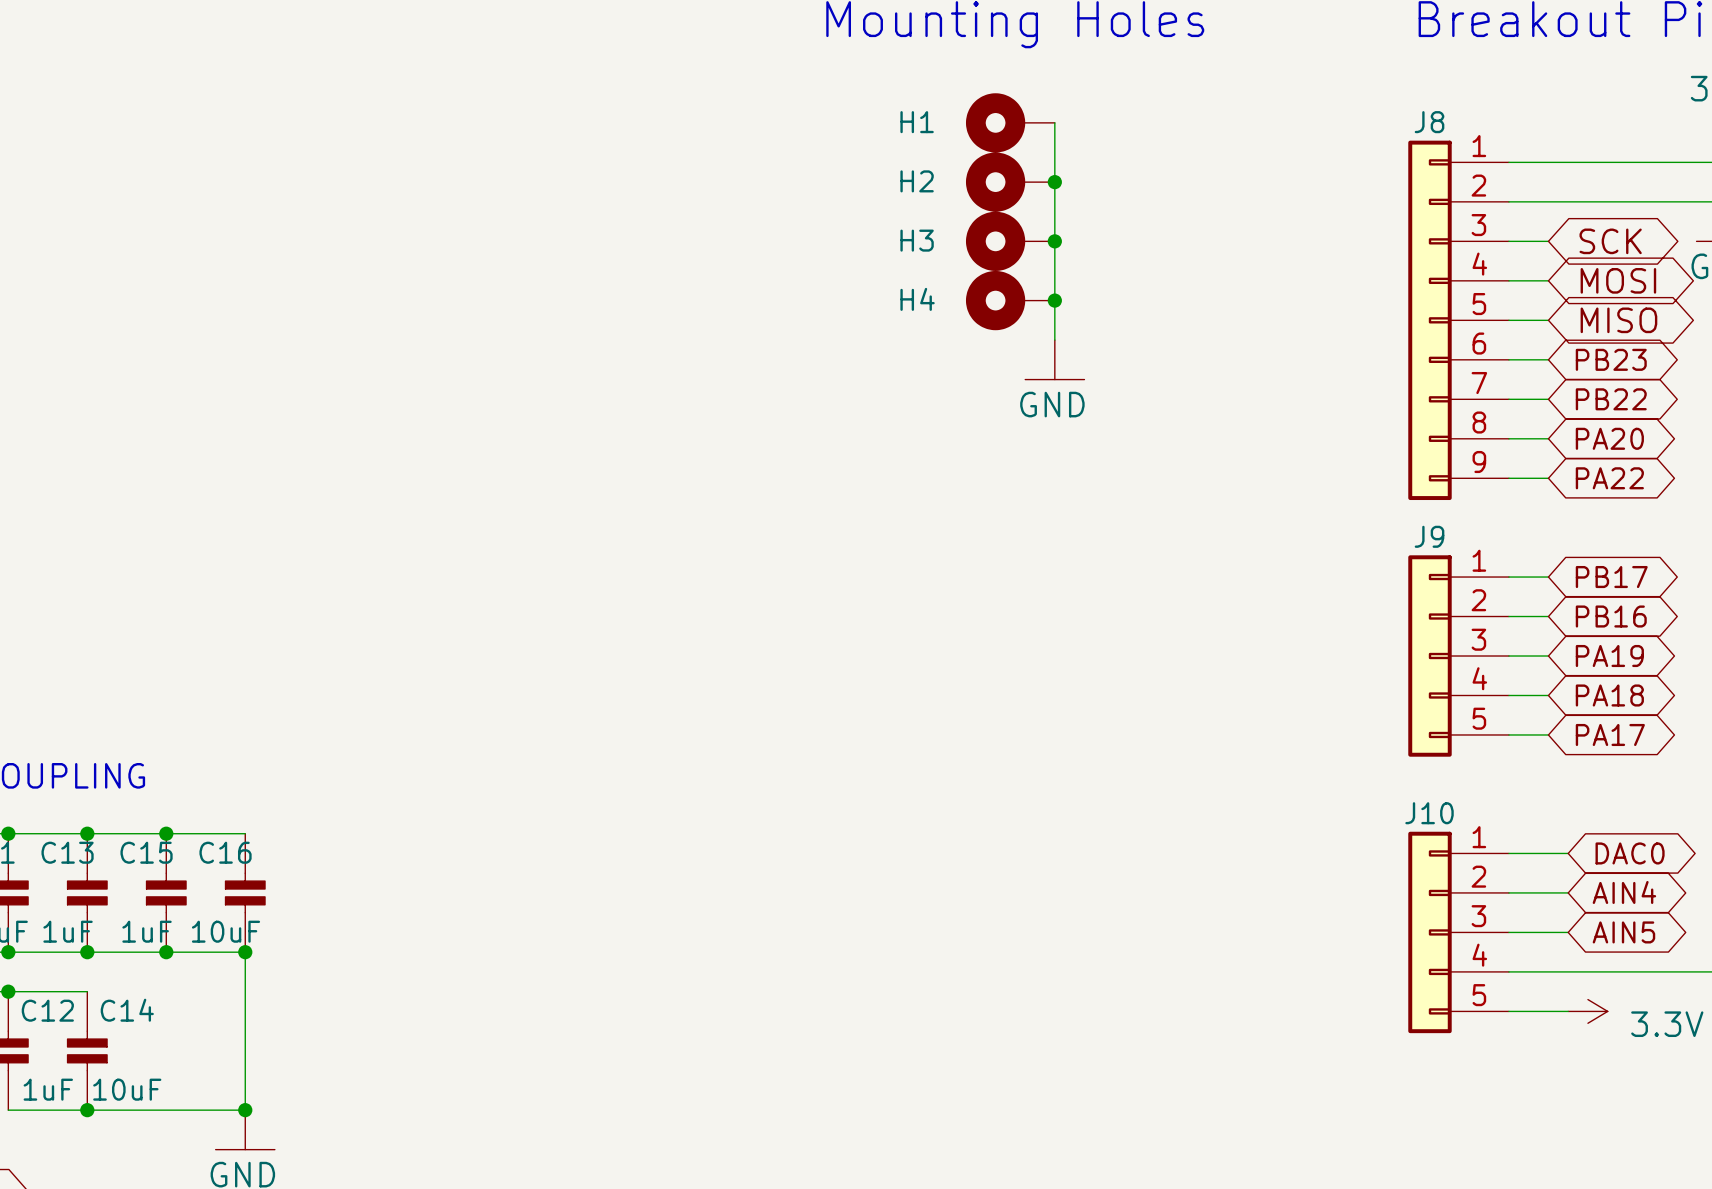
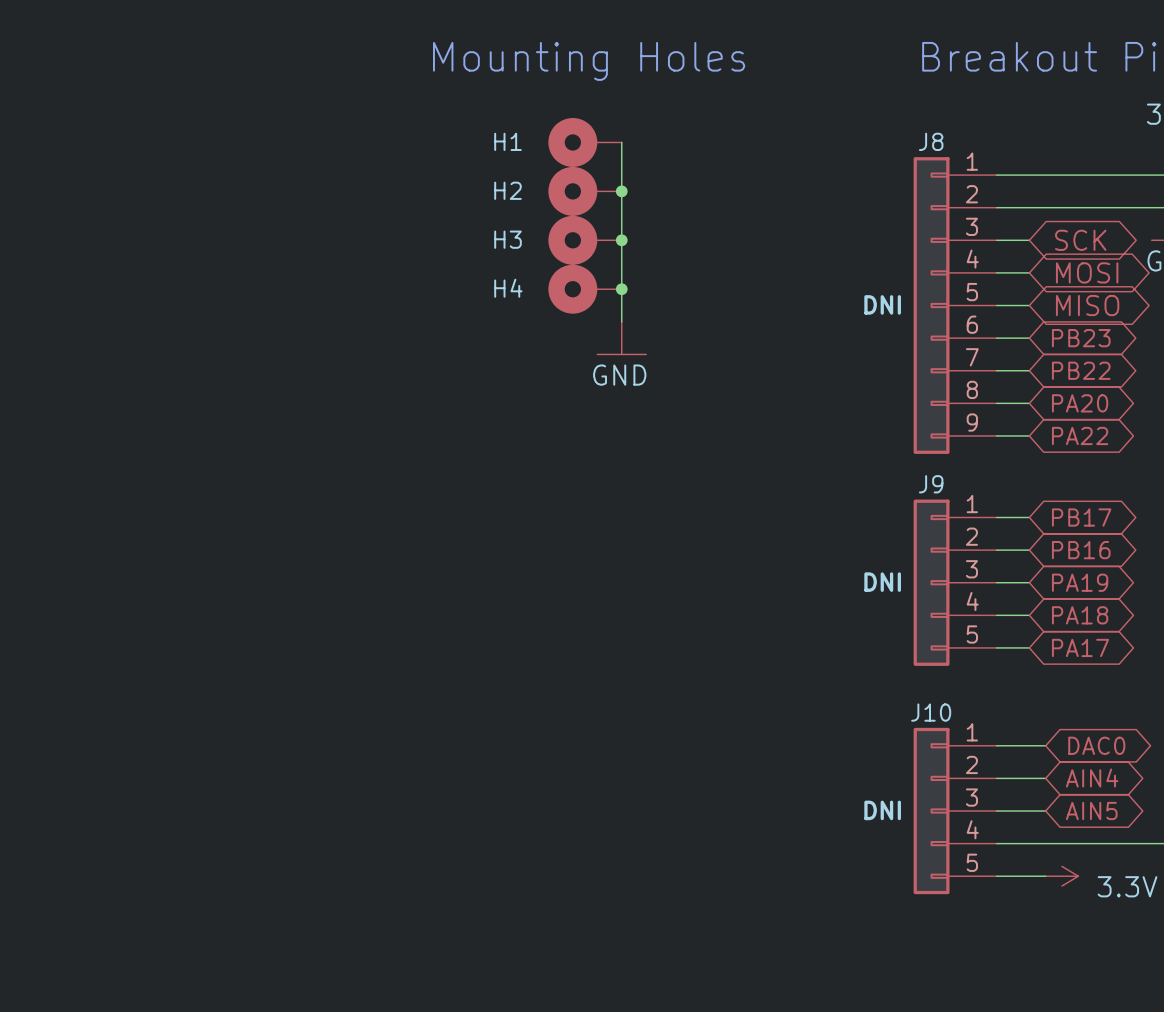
J8 text: none -> DNI (882, 304)
J9 text: none -> DNI (882, 582)
J10 text: none -> DNI (882, 810)

